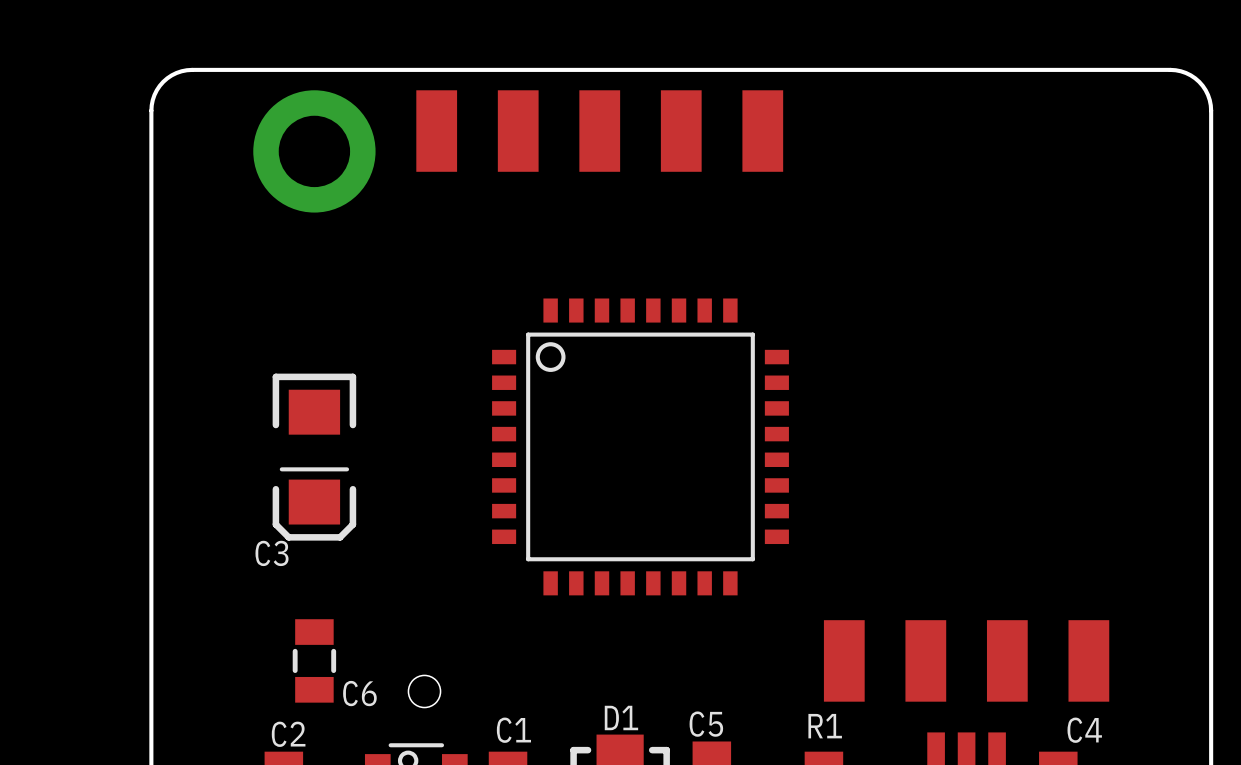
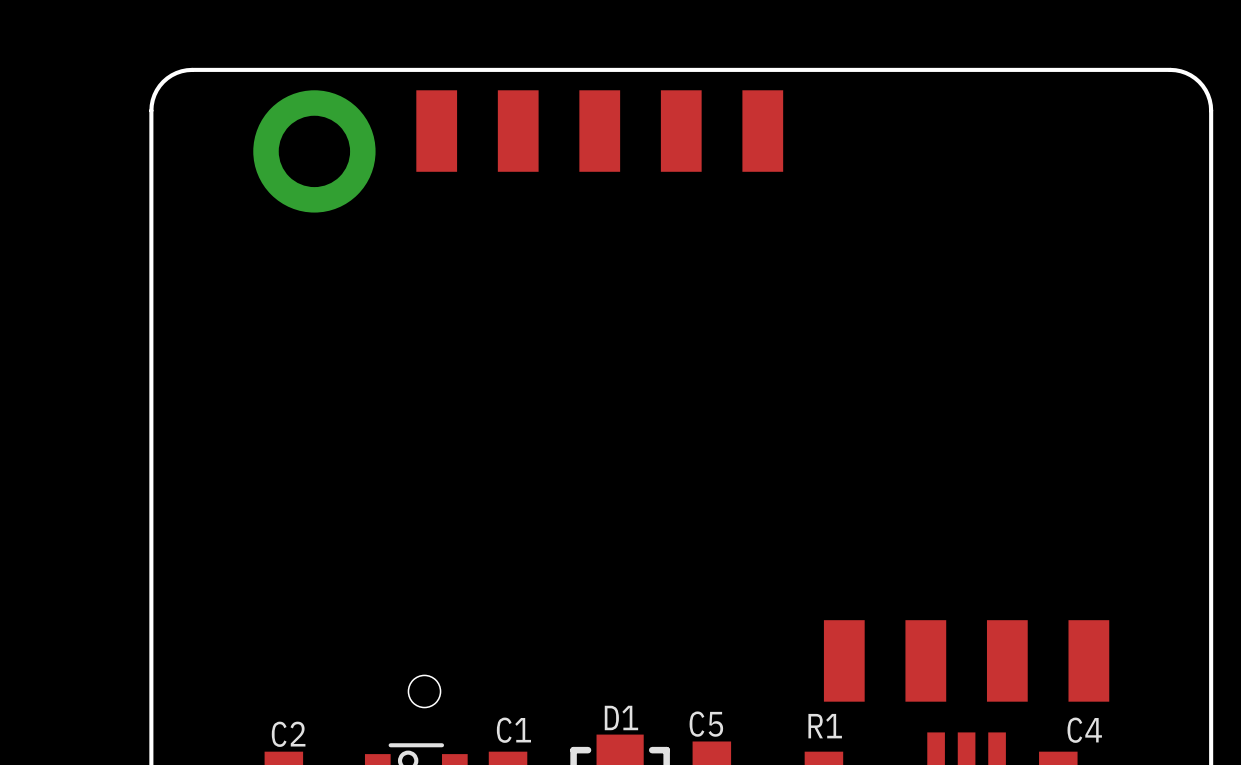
part: (640, 446) -> none
C3: (314, 457) -> none
C6: (314, 660) -> none

